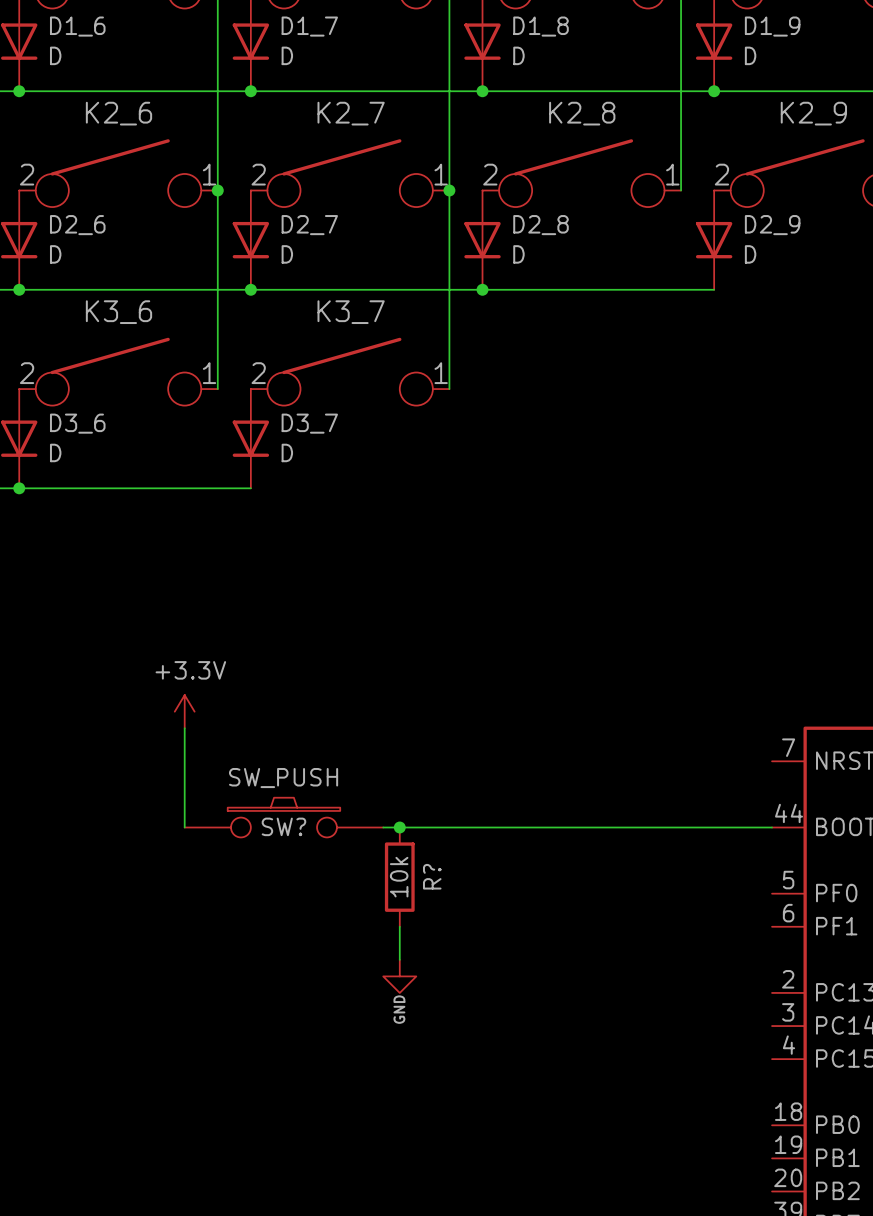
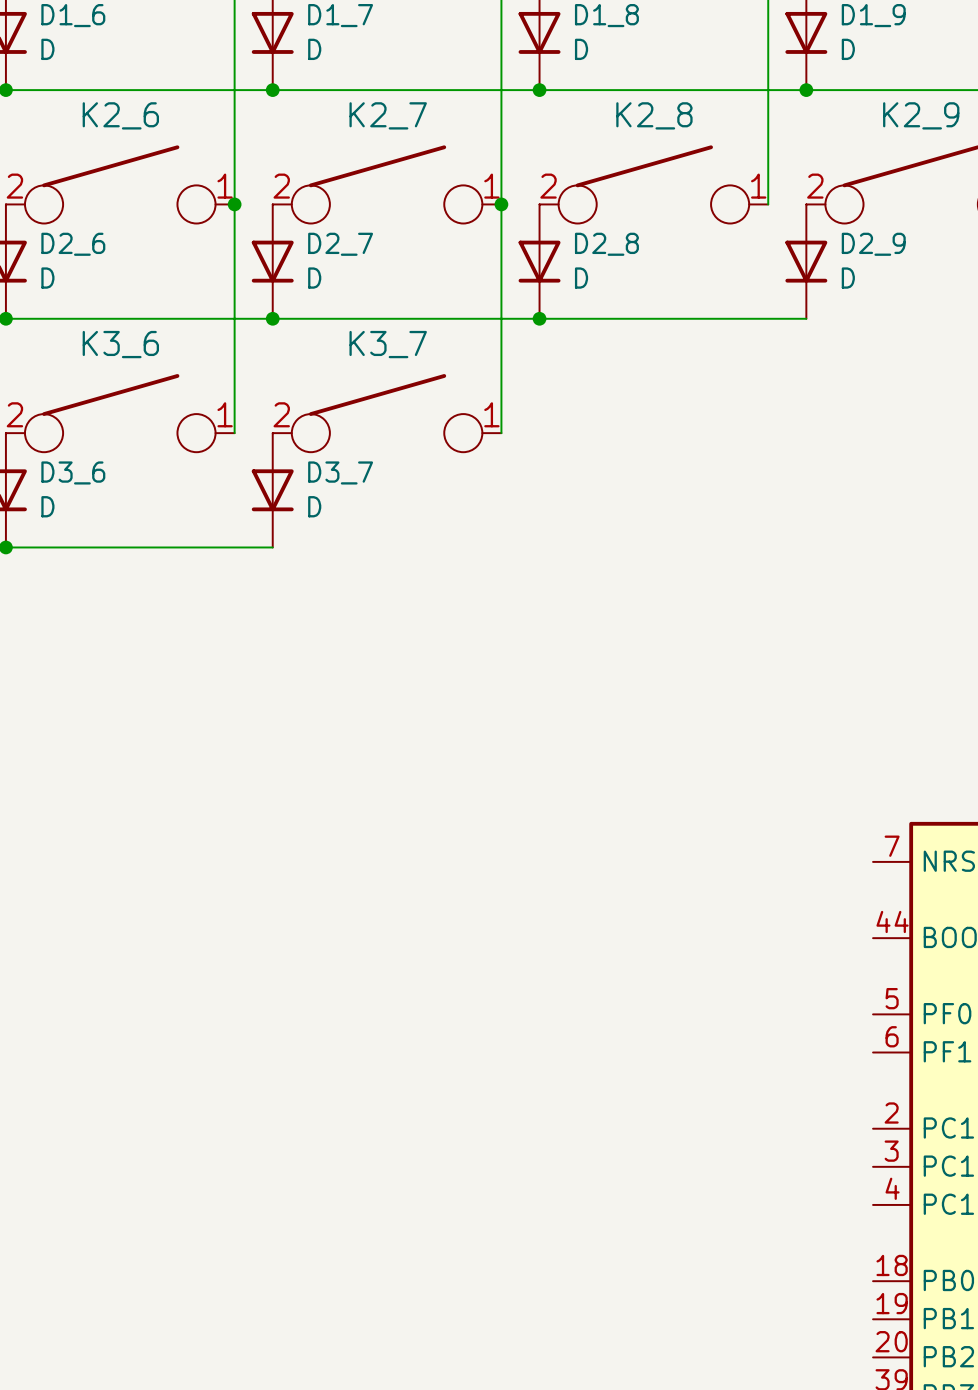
power symbol: +3.3V (184, 711) -> none
wire: (184, 728) (184, 827) -> none
SW?: SW_PUSH (283, 817) -> none
wire: (383, 827) (772, 827) -> none
junction: (399, 827) -> none
R?: 10k (399, 877) -> none
wire: (399, 926) (399, 959) -> none
power symbol: GND (399, 976) -> none

